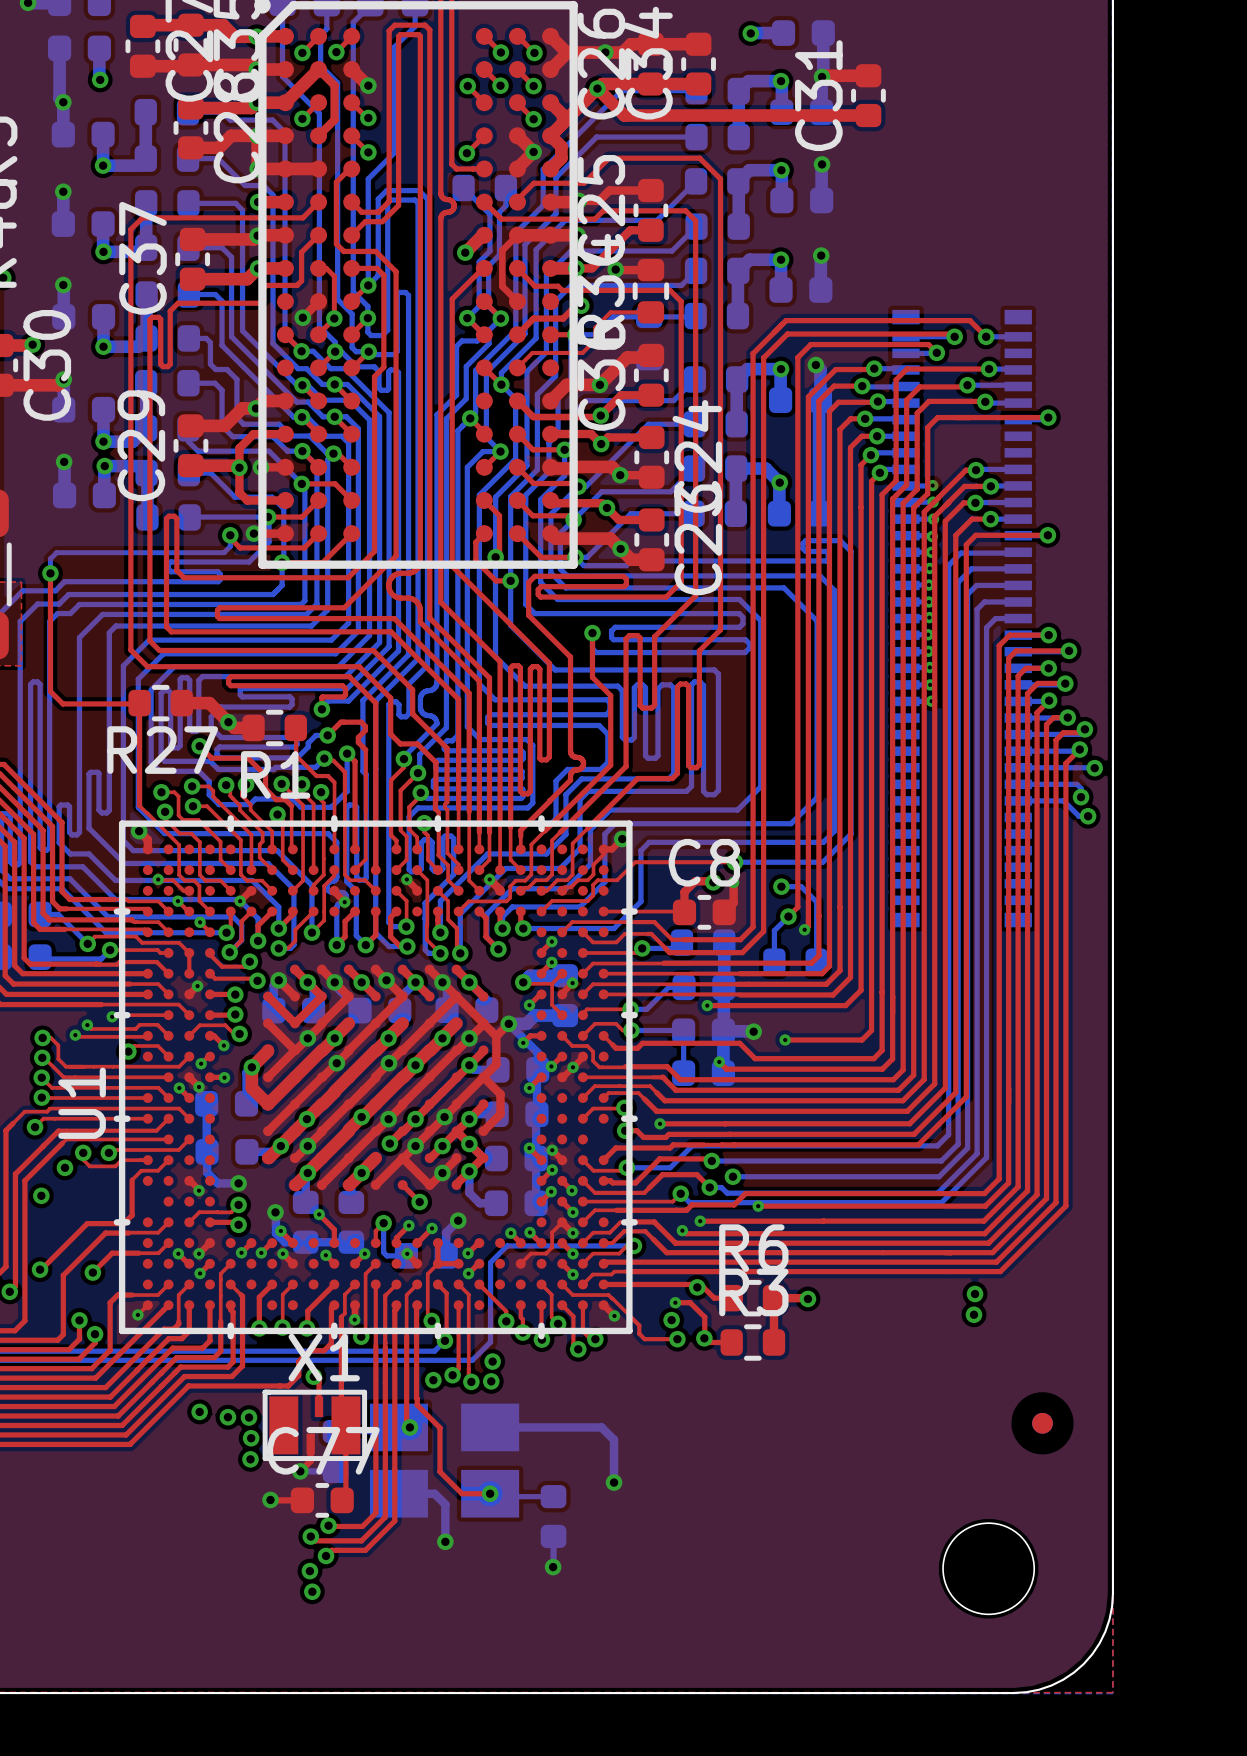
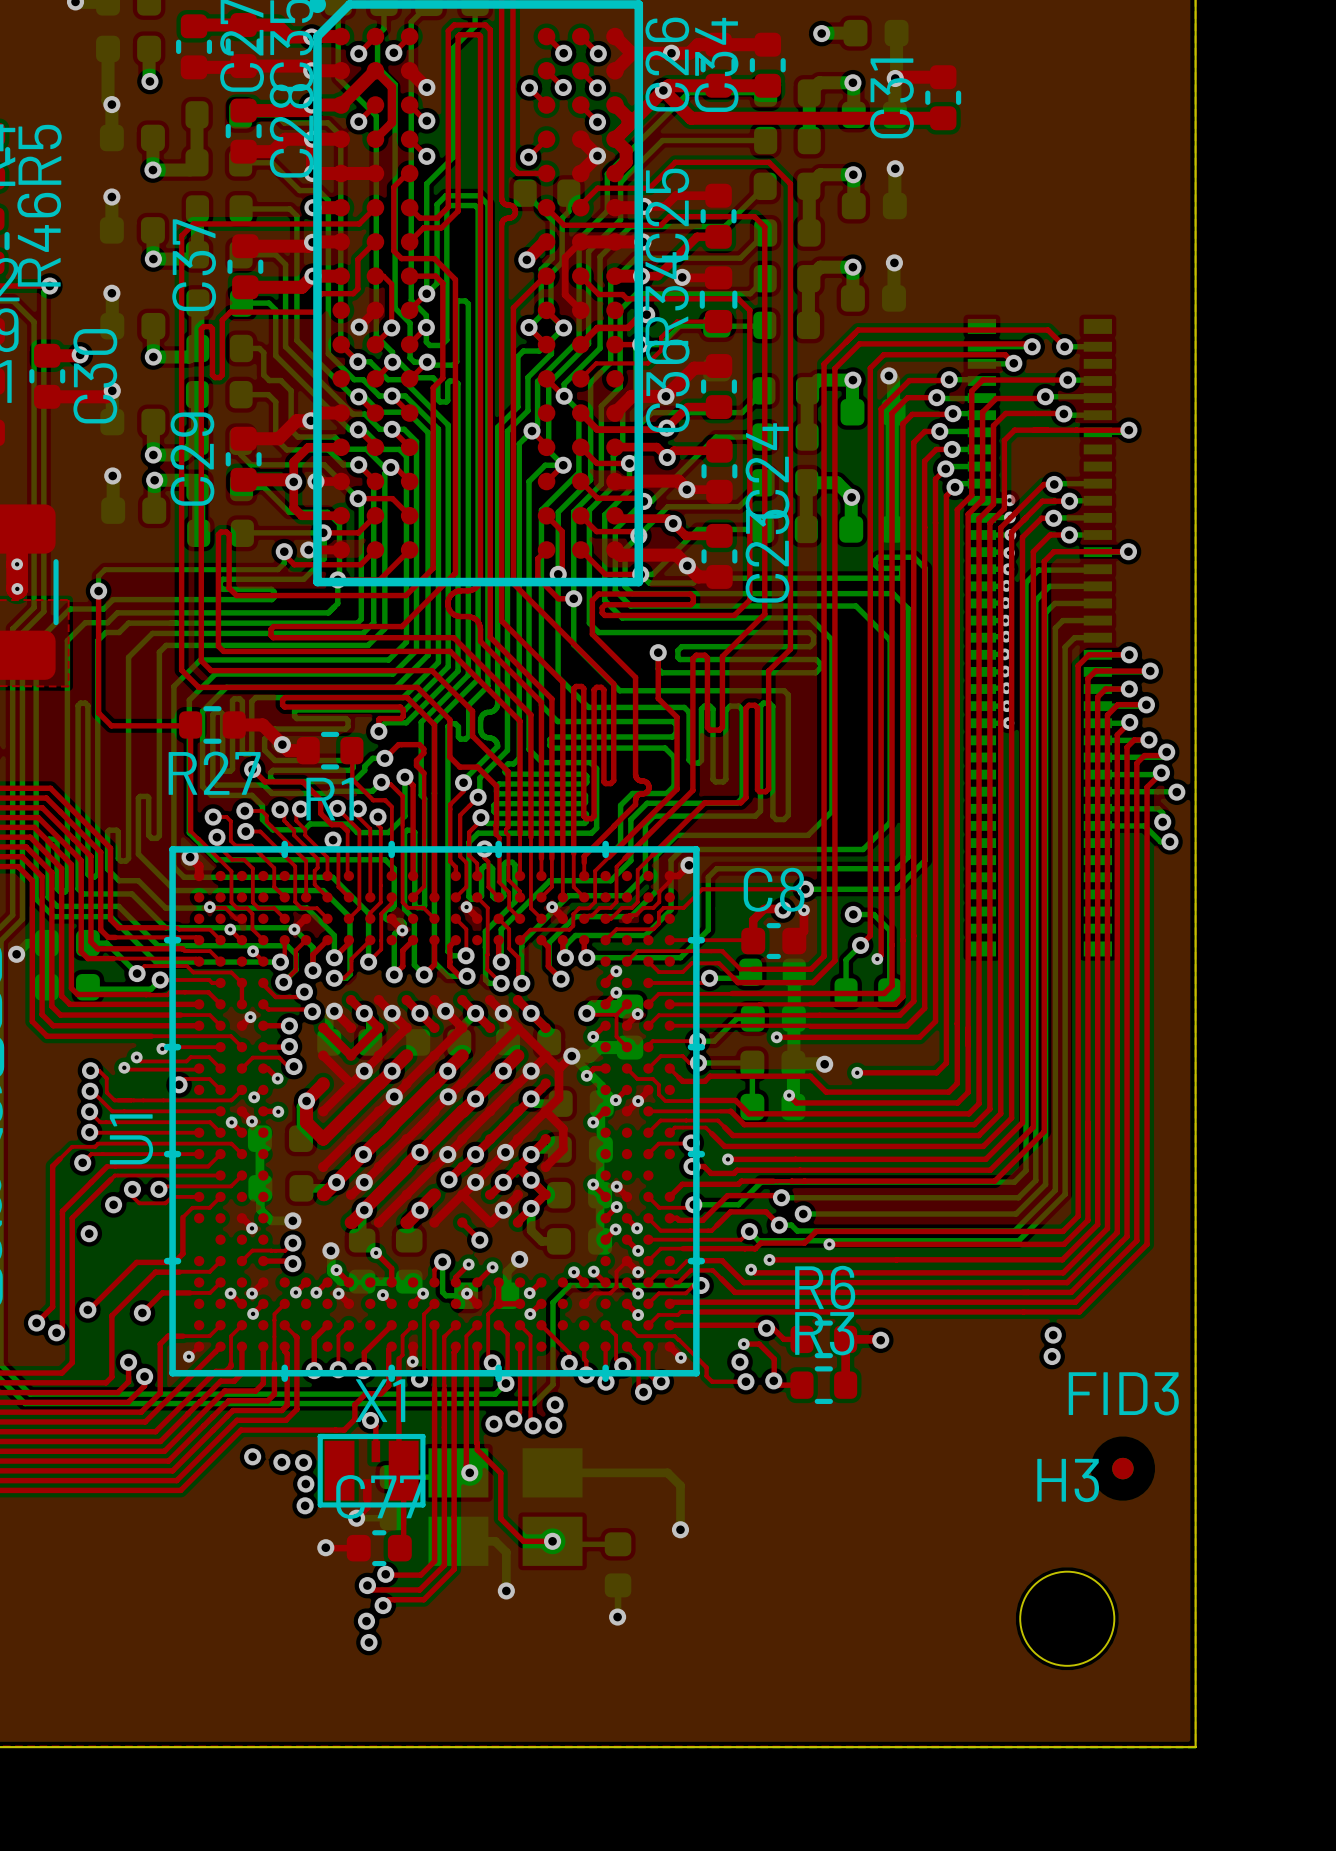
FID3 name: none -> FID3 (1123, 1393)
H3 name: none -> H3 (1068, 1480)
board edge: (1112, 1593) (1112, 1606) (1105, 1631) (1099, 1643) (1083, 1663) (1074, 1672) (1051, 1685) (1026, 1692) (1013, 1693) -> (1195, 1644) (1195, 1747) (1092, 1747)

